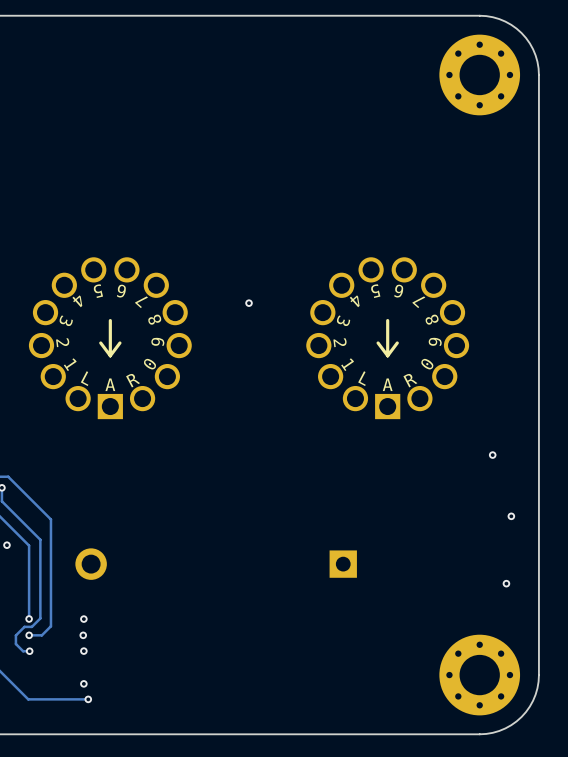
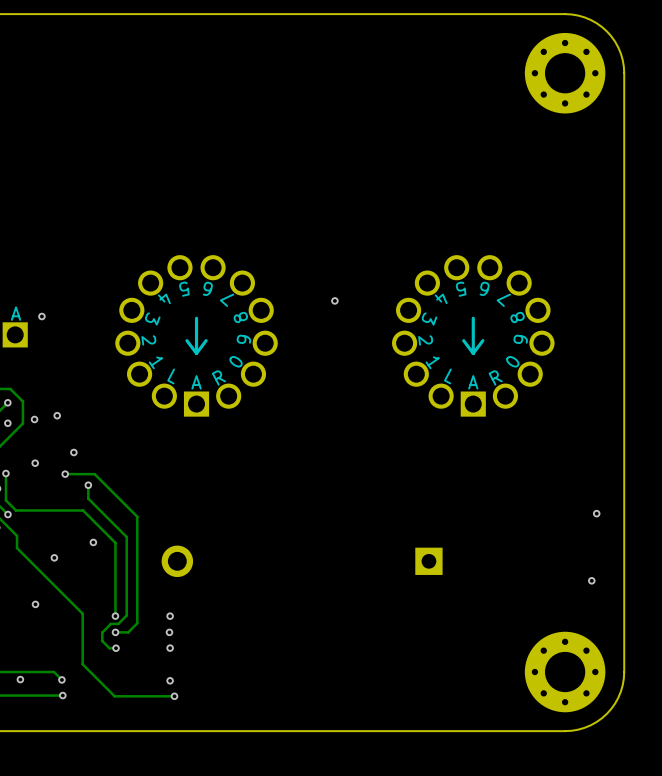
via: (492, 455) -> none

